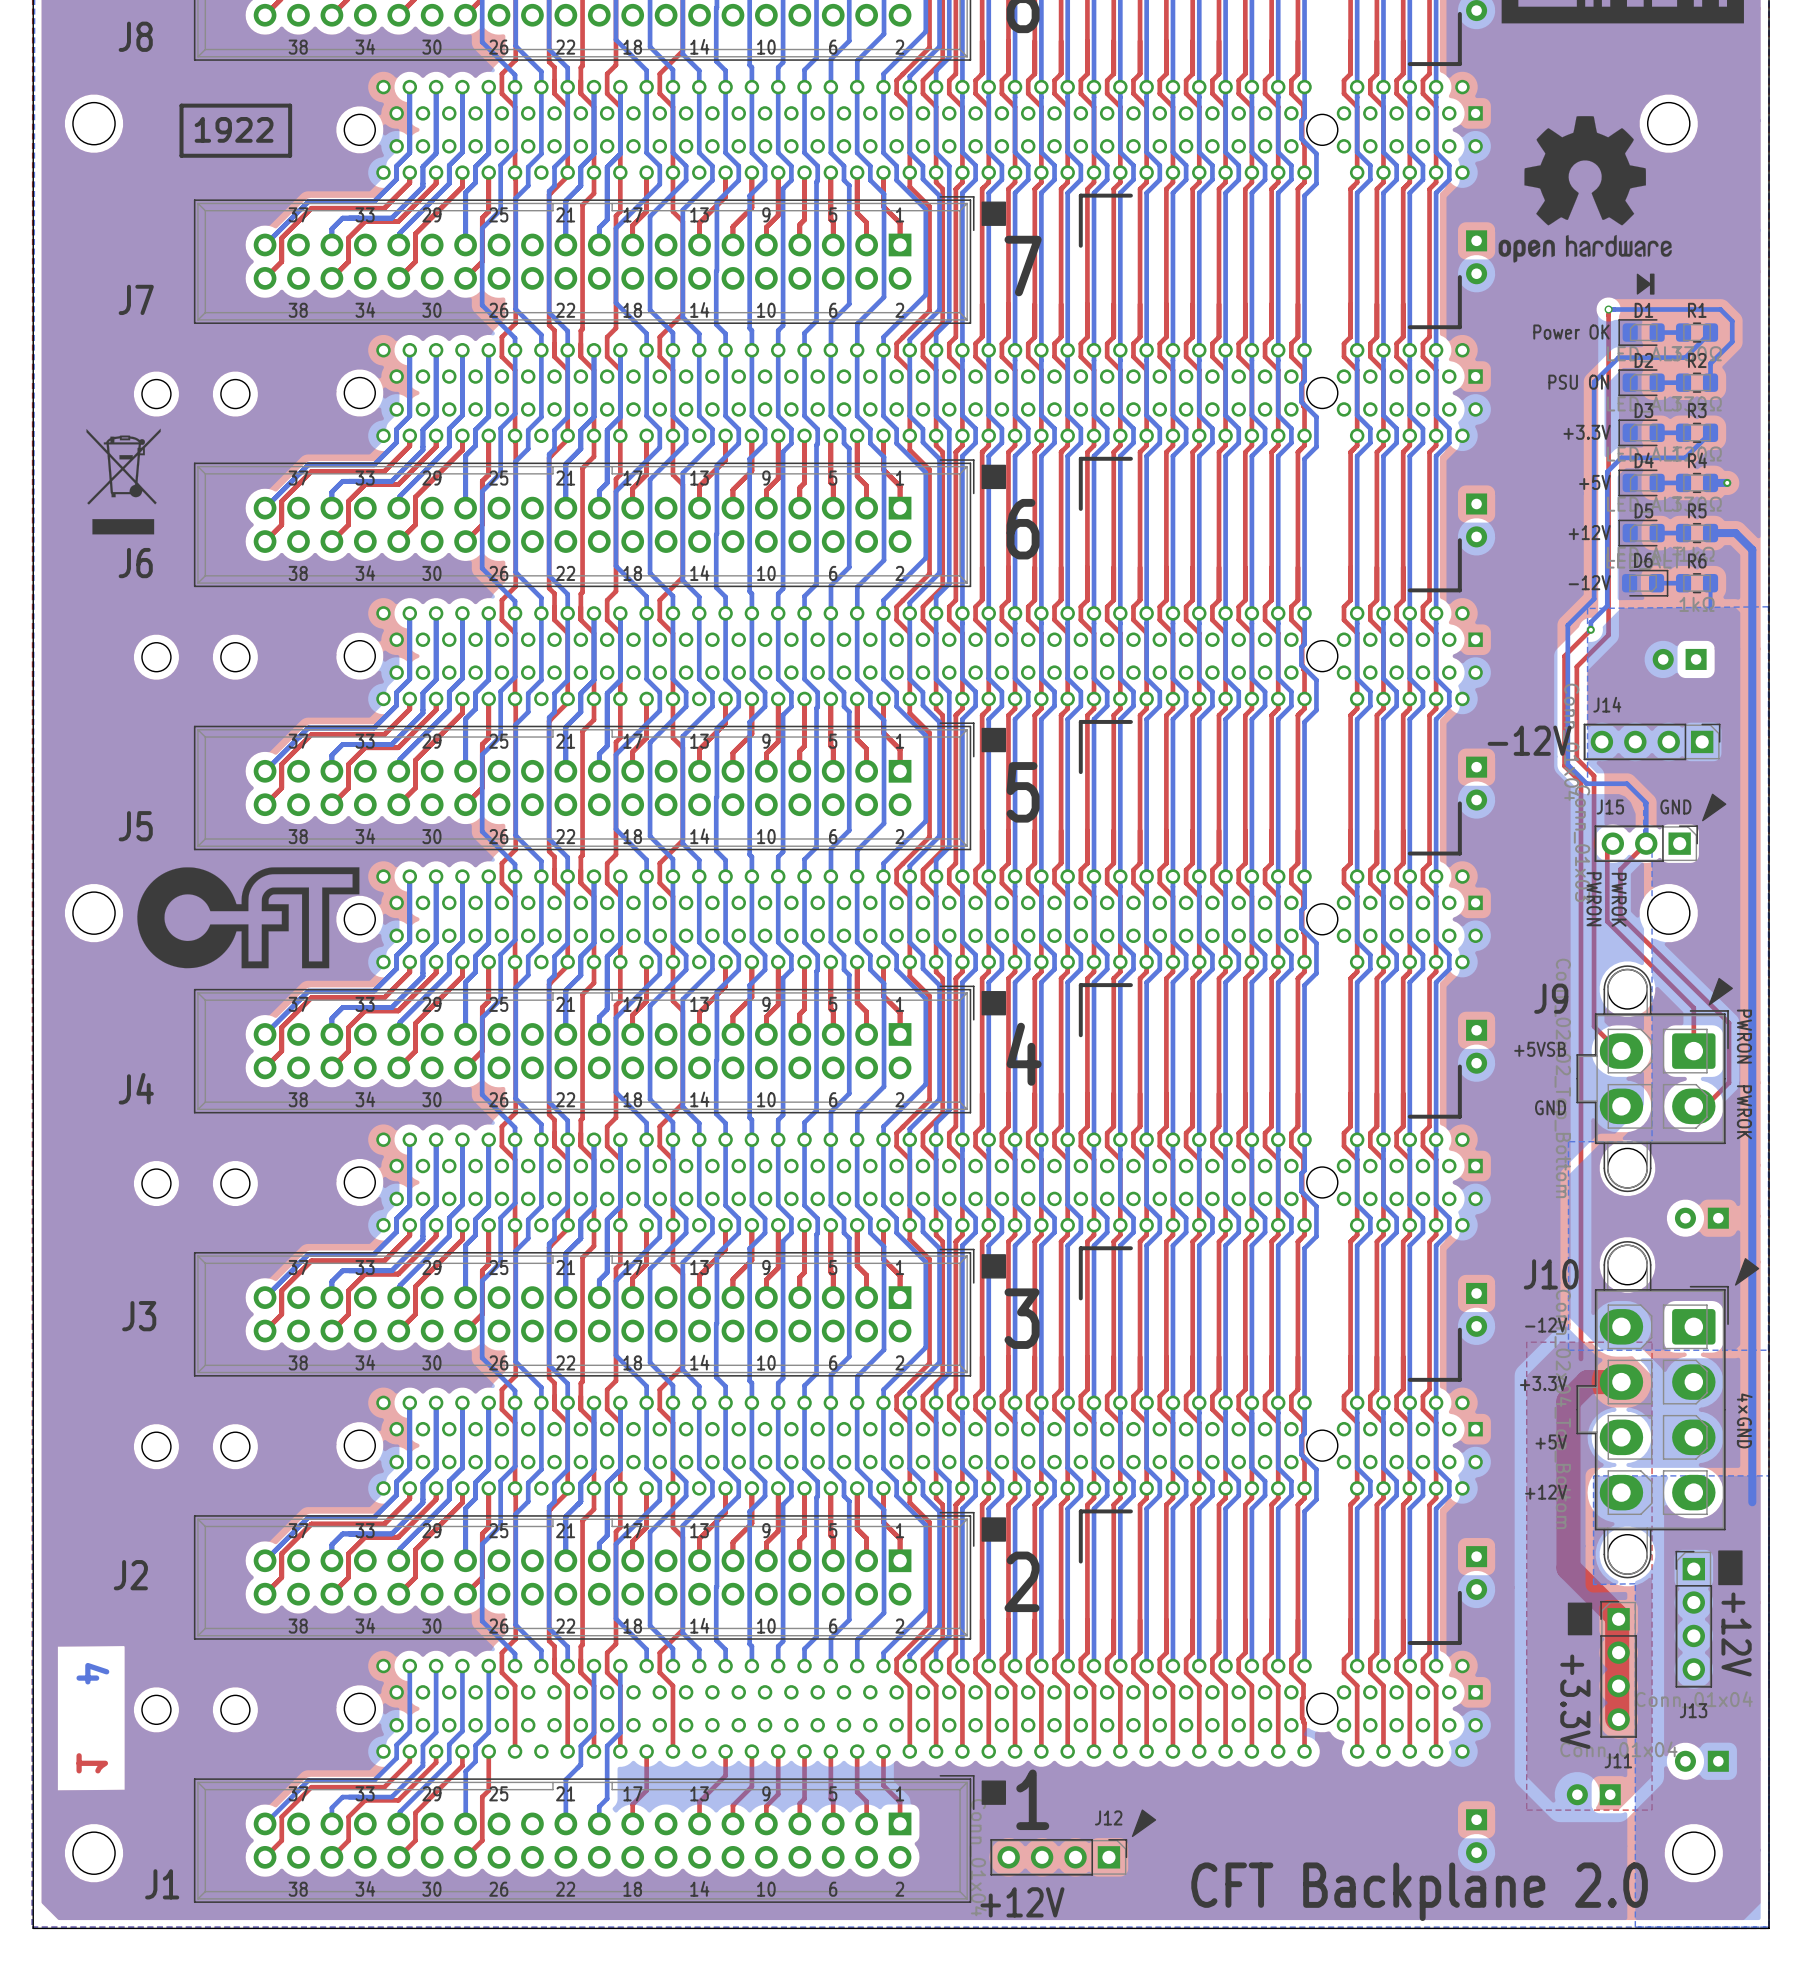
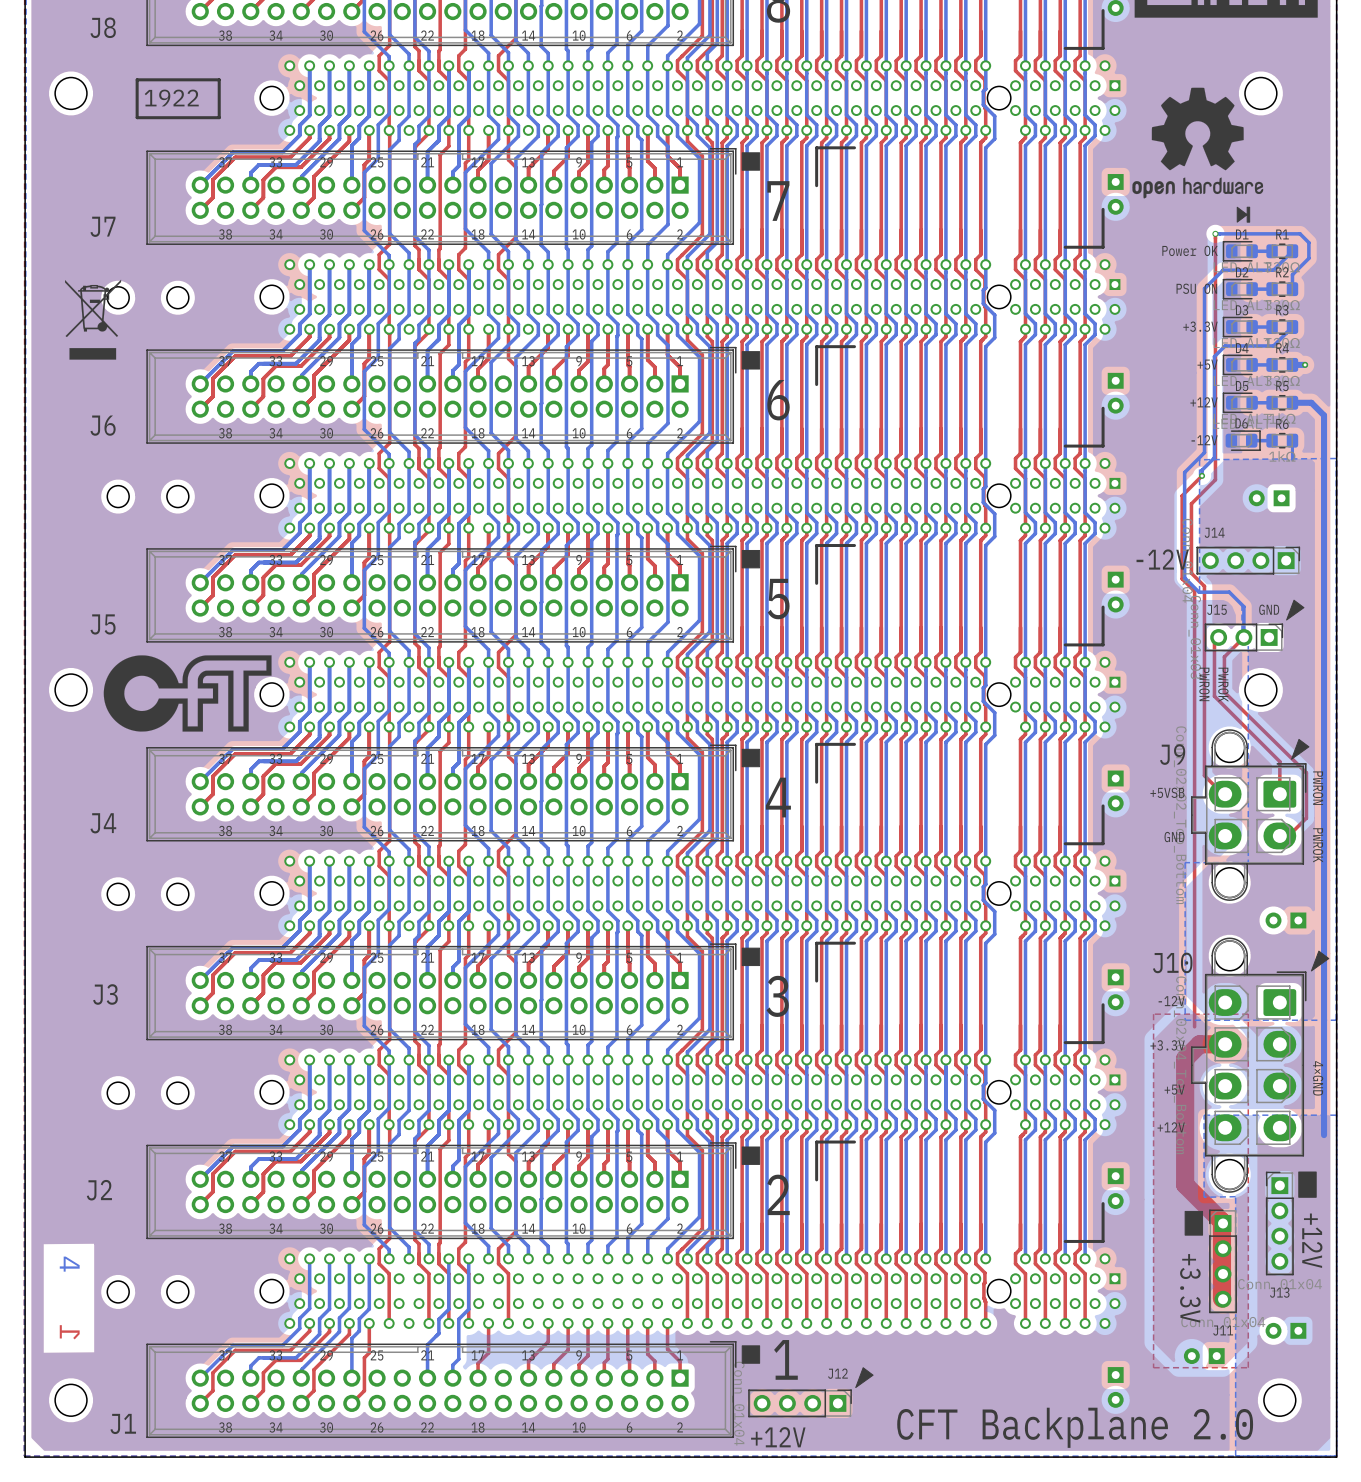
drawing position: (123, 481) -> (93, 319)

